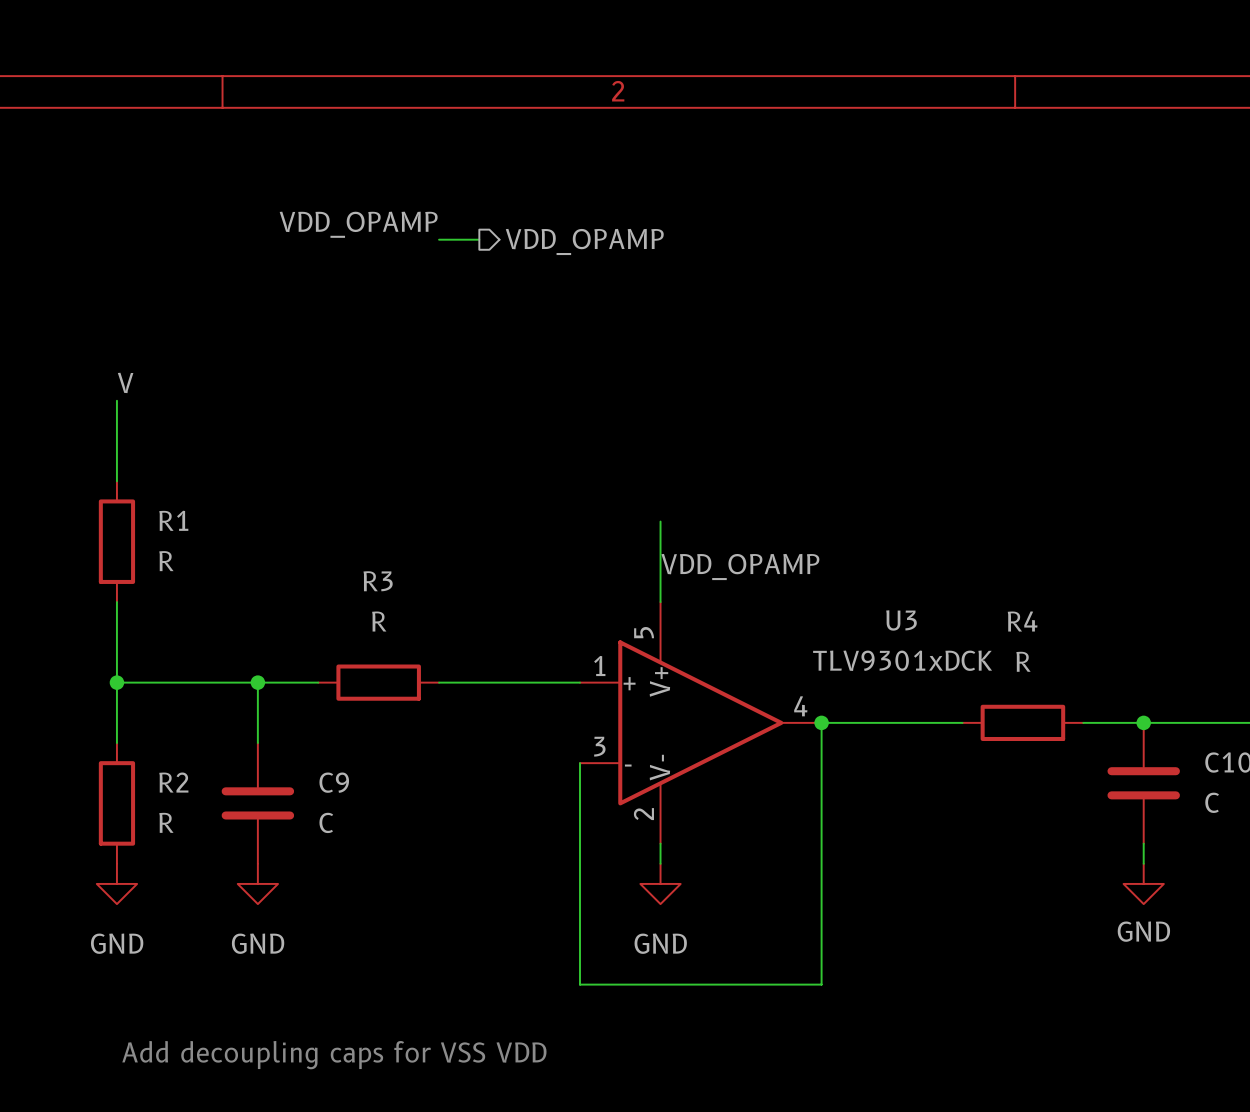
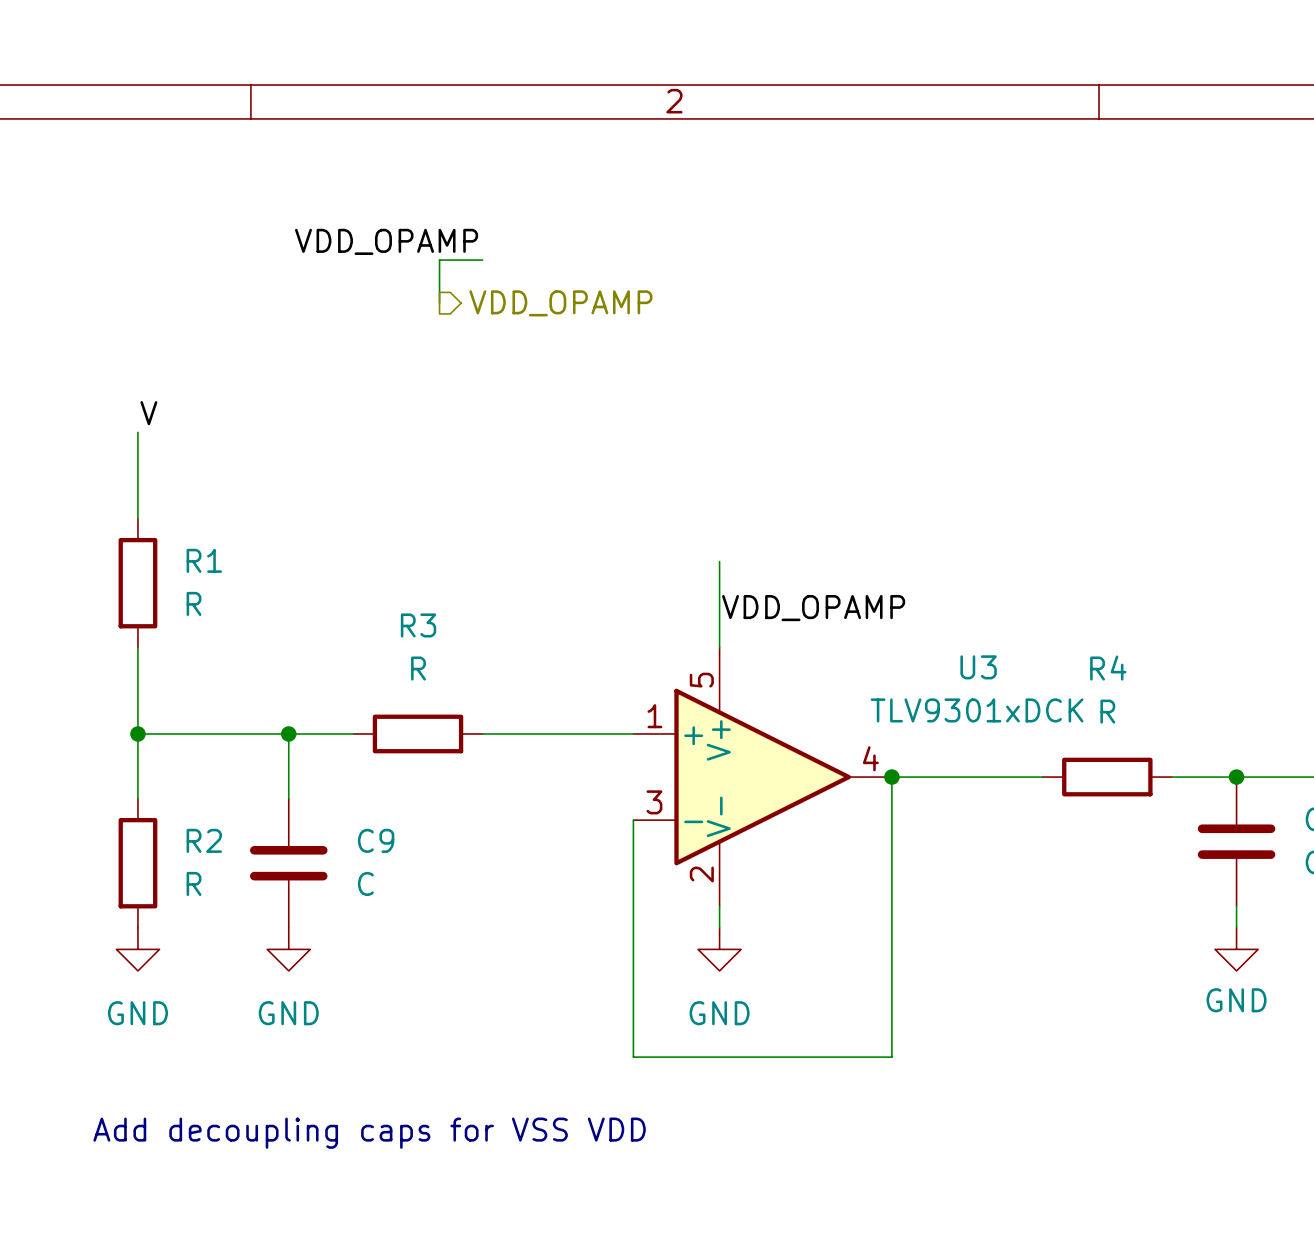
wire: (439, 239) (479, 239) -> (482, 260) (439, 260) (439, 303)
hierarchical label position: VDD_OPAMP (584, 241) -> VDD_OPAMP (560, 303)

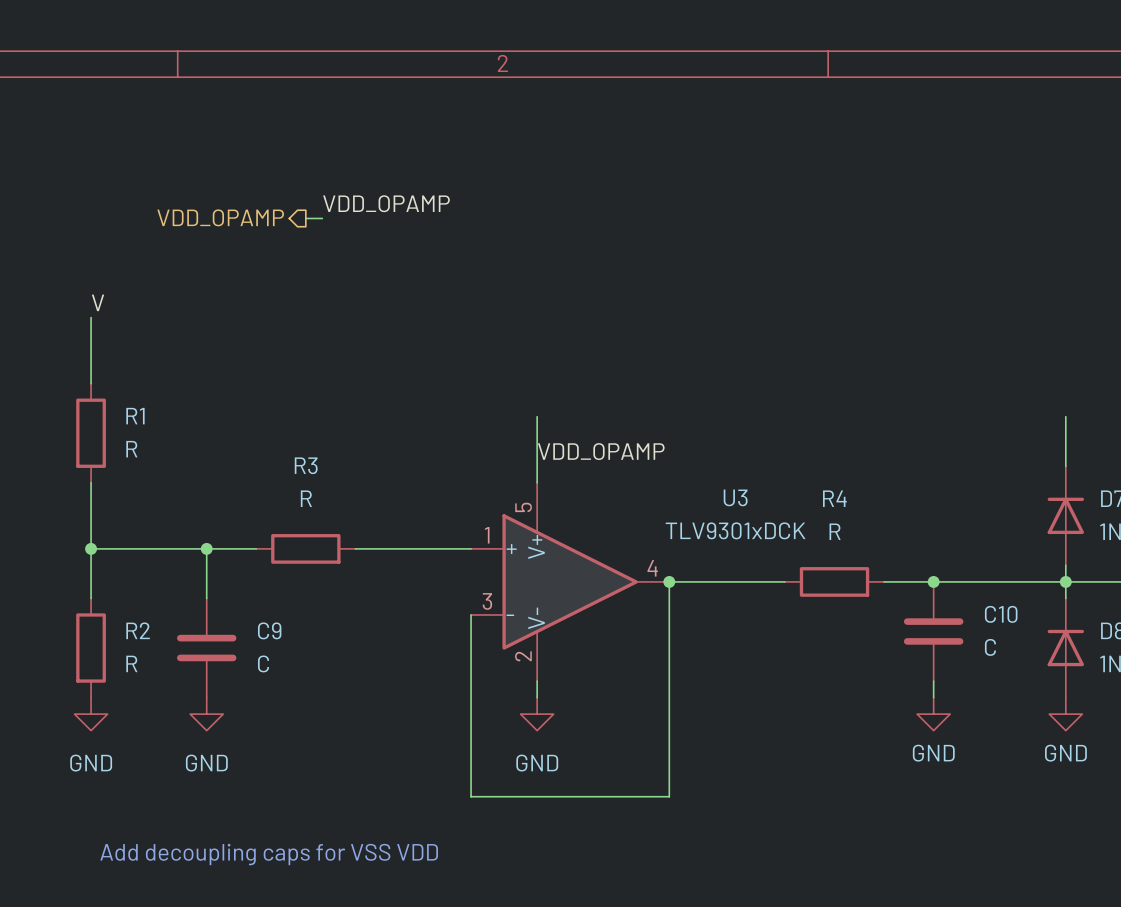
label position: VDD_OPAMP (386, 241) -> VDD_OPAMP (386, 203)
wire: (482, 260) (439, 260) (439, 303) -> (305, 218) (322, 218)
hierarchical label rotation: 0° (560, 303) -> 180° (220, 217)
hierarchical label position: VDD_OPAMP (560, 303) -> VDD_OPAMP (220, 217)

